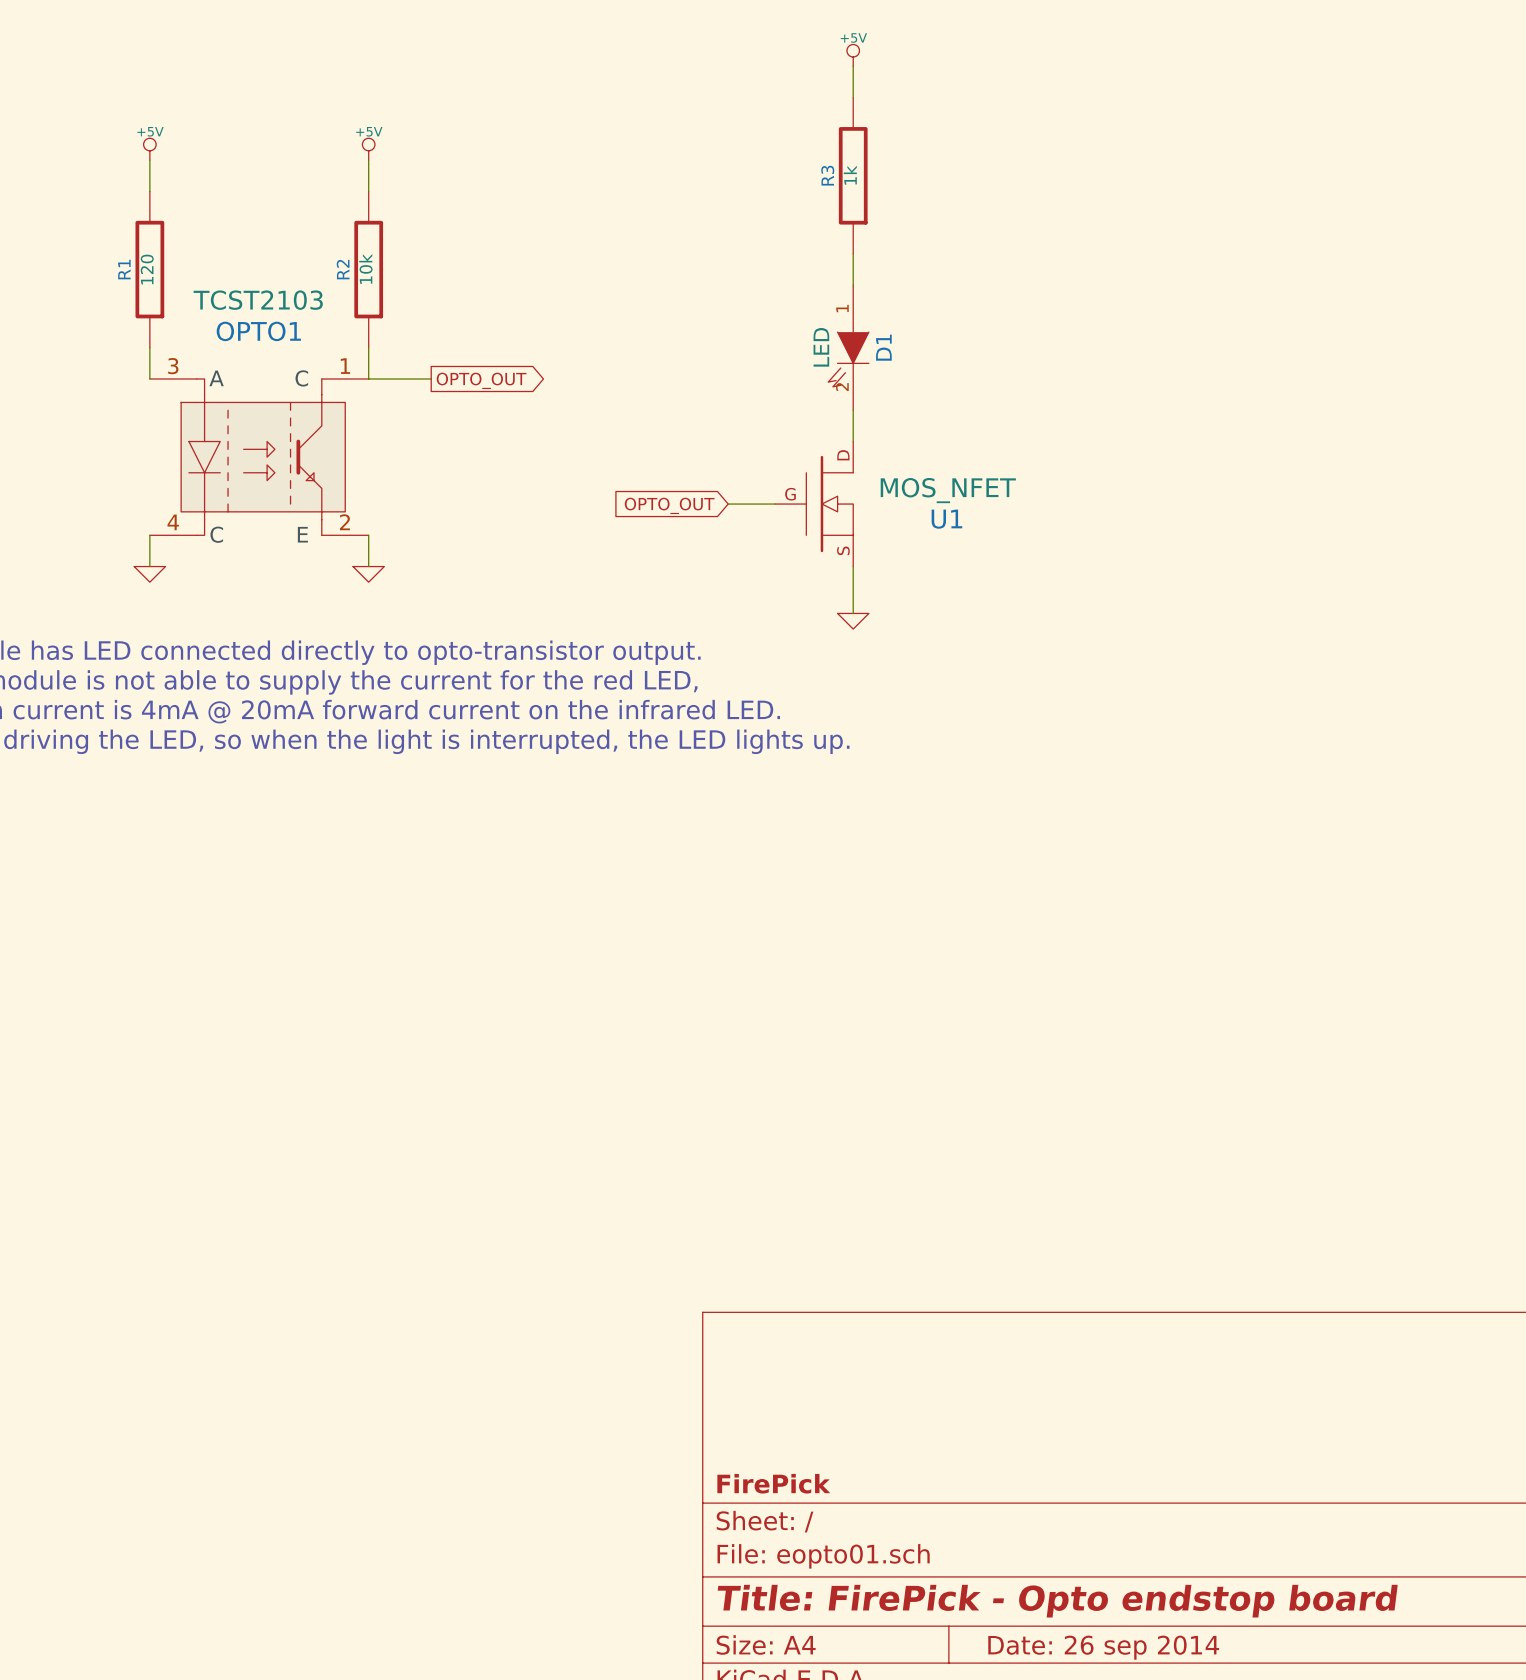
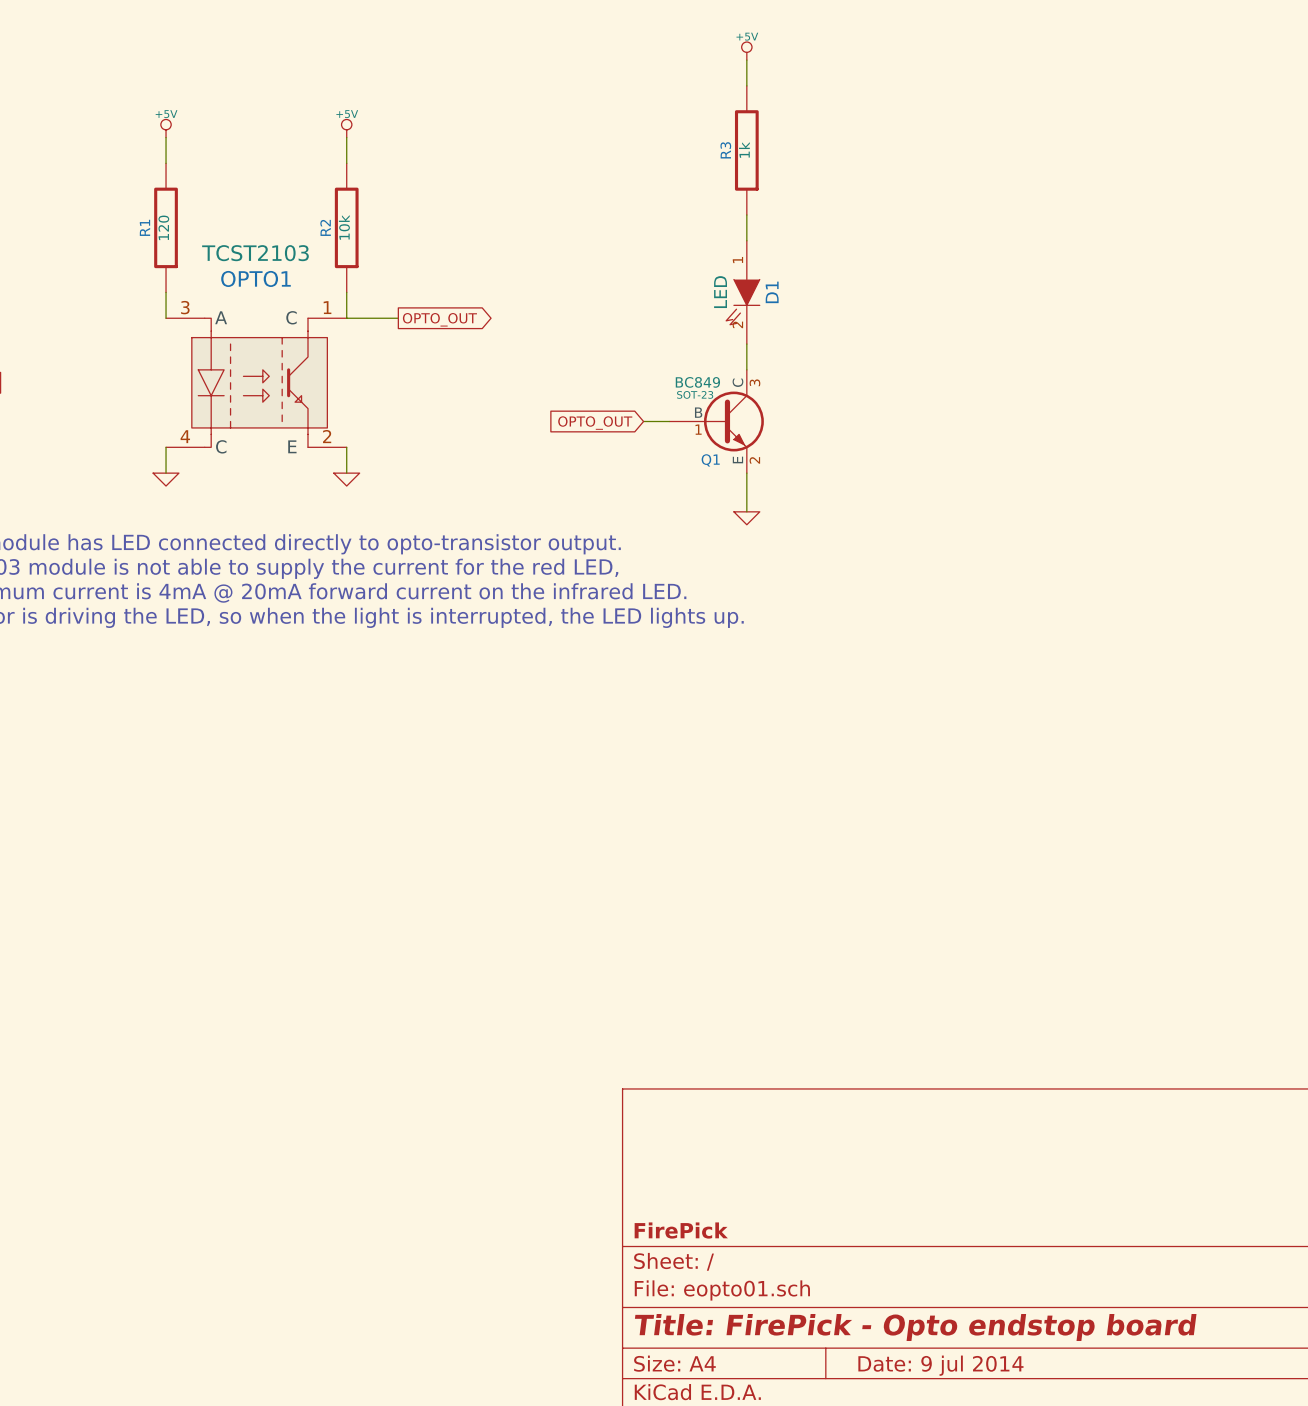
U1: MOS_NFET (814, 504) -> none
Q1: none -> BC849 (716, 421)
title block: Date: 26 sep 2014 (1103, 1647) -> Date: 9 jul 2014 (940, 1365)

